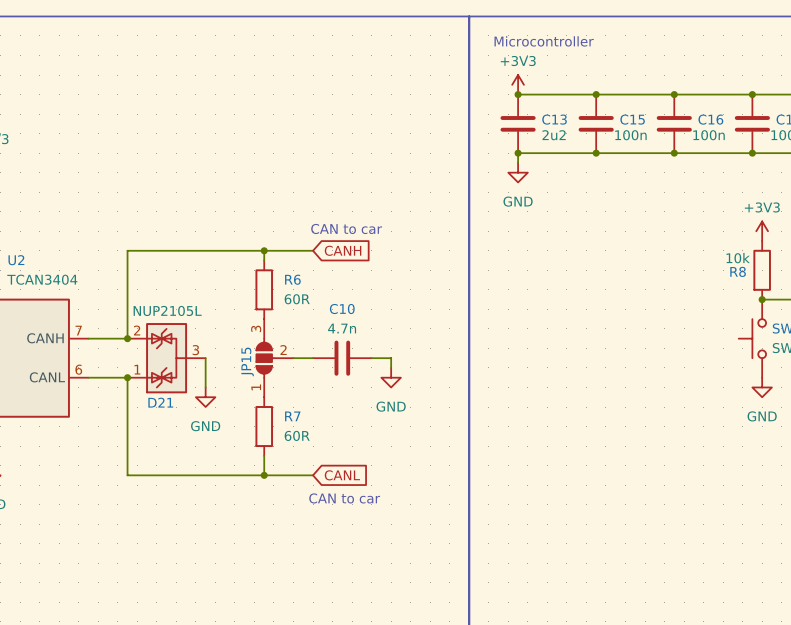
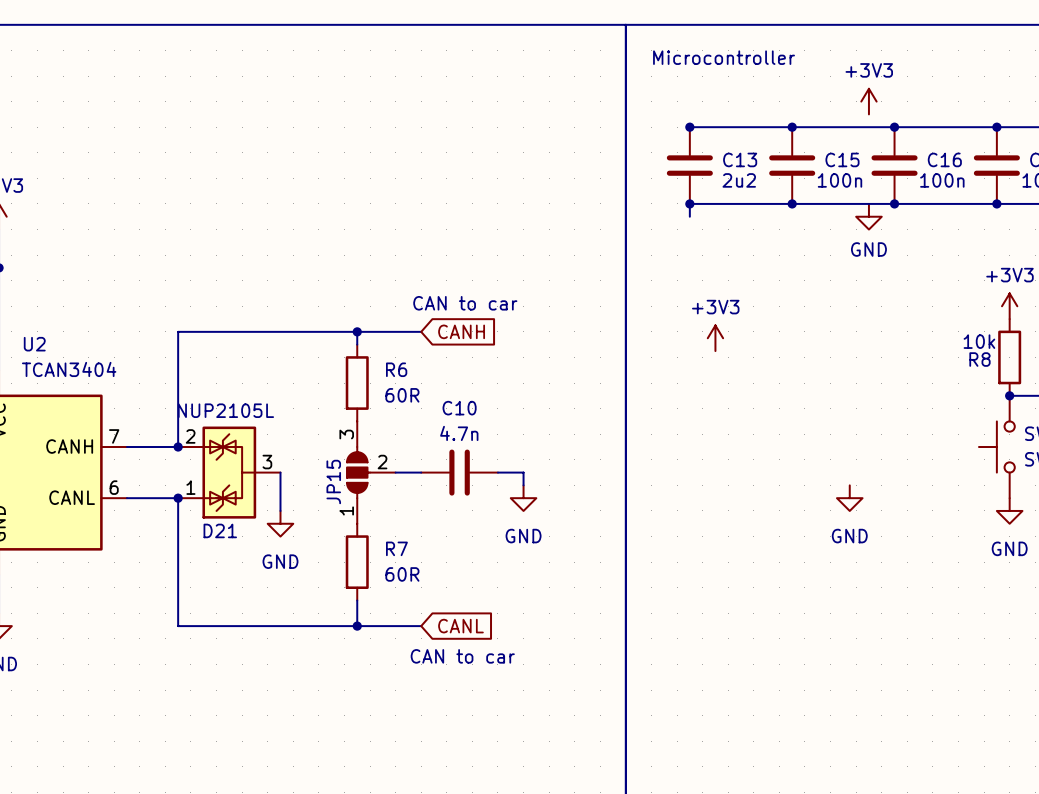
power symbol: none -> +3V3 (868, 101)
power symbol: +3V3 (518, 84) -> none
power symbol: none -> GND (868, 216)
power symbol: GND (518, 172) -> none
power symbol: none -> +3V3 (715, 338)
power symbol: none -> GND (849, 498)

